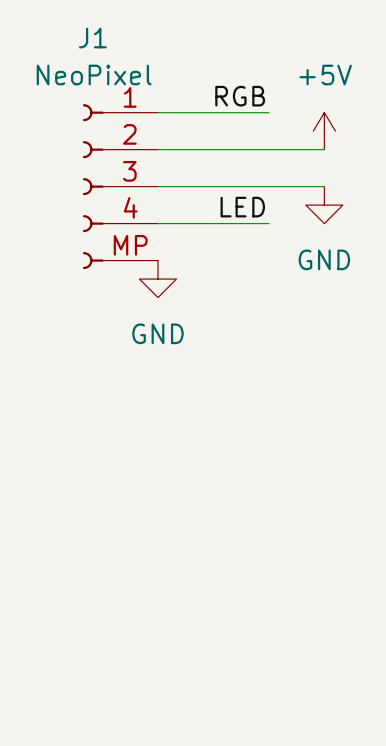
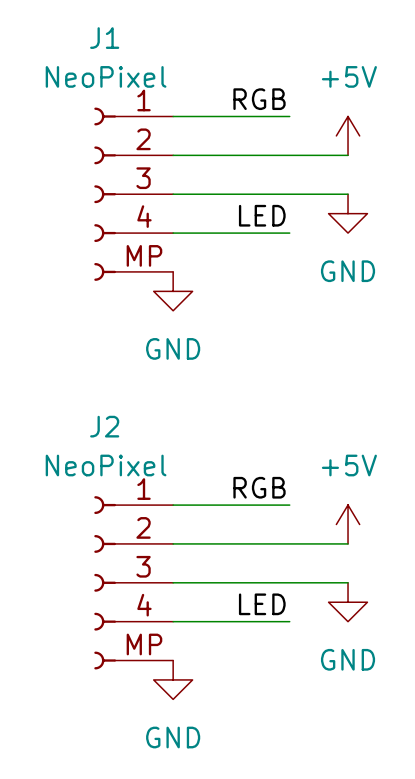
label: none -> RGB (259, 487)
wire: none -> (173, 505) (289, 505)
power symbol: none -> +5V (348, 524)
wire: none -> (173, 543) (348, 543)
J2: none -> NeoPixel (133, 582)
wire: none -> (173, 582) (348, 582)
power symbol: none -> GND (348, 602)
label: none -> LED (262, 604)
wire: none -> (173, 621) (289, 621)
power symbol: none -> GND (173, 679)

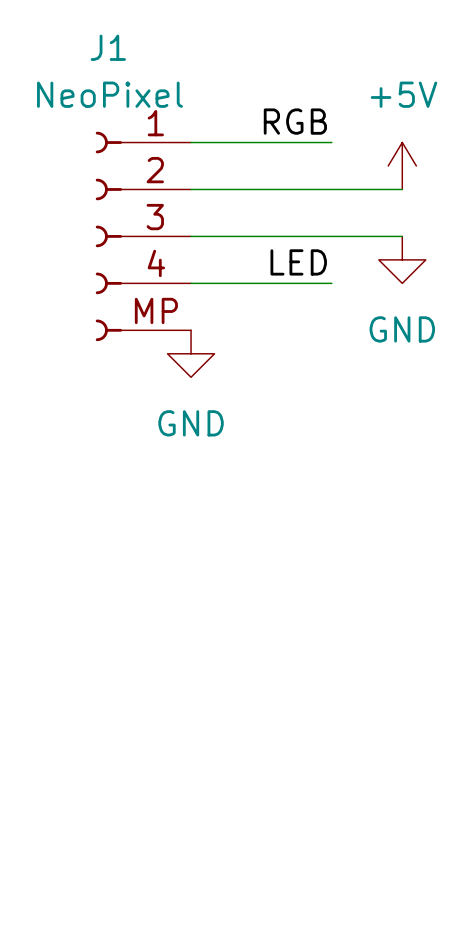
label: RGB (259, 487) -> none
wire: (173, 505) (289, 505) -> none
power symbol: +5V (348, 524) -> none
wire: (173, 543) (348, 543) -> none
J2: NeoPixel (133, 582) -> none
wire: (173, 582) (348, 582) -> none
power symbol: GND (348, 602) -> none
label: LED (262, 604) -> none
wire: (173, 621) (289, 621) -> none
power symbol: GND (173, 679) -> none

